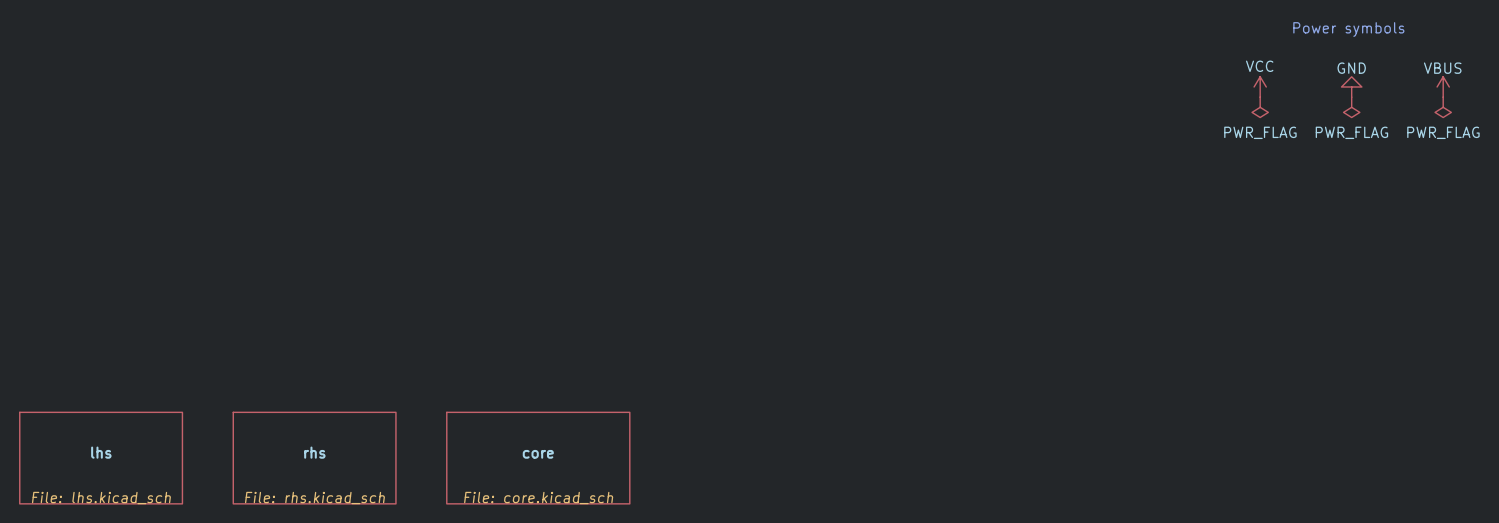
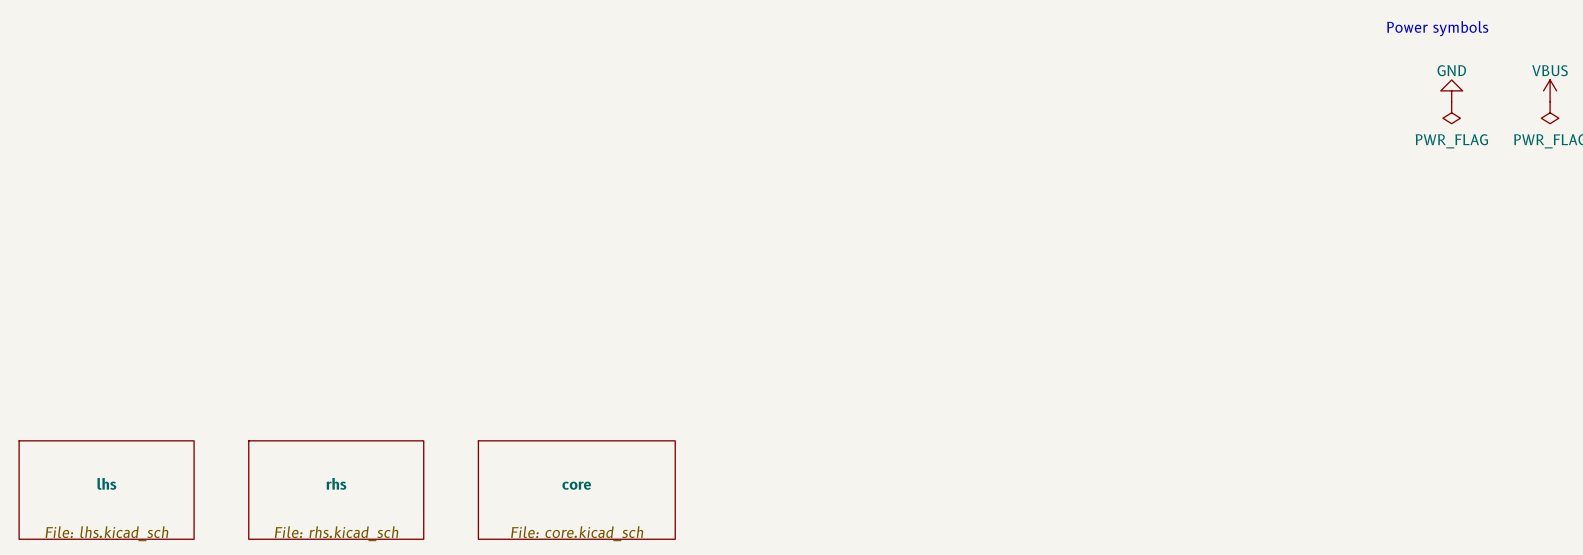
power symbol: VCC (1260, 86) -> none
power symbol: PWR_FLAG (1260, 107) -> none

